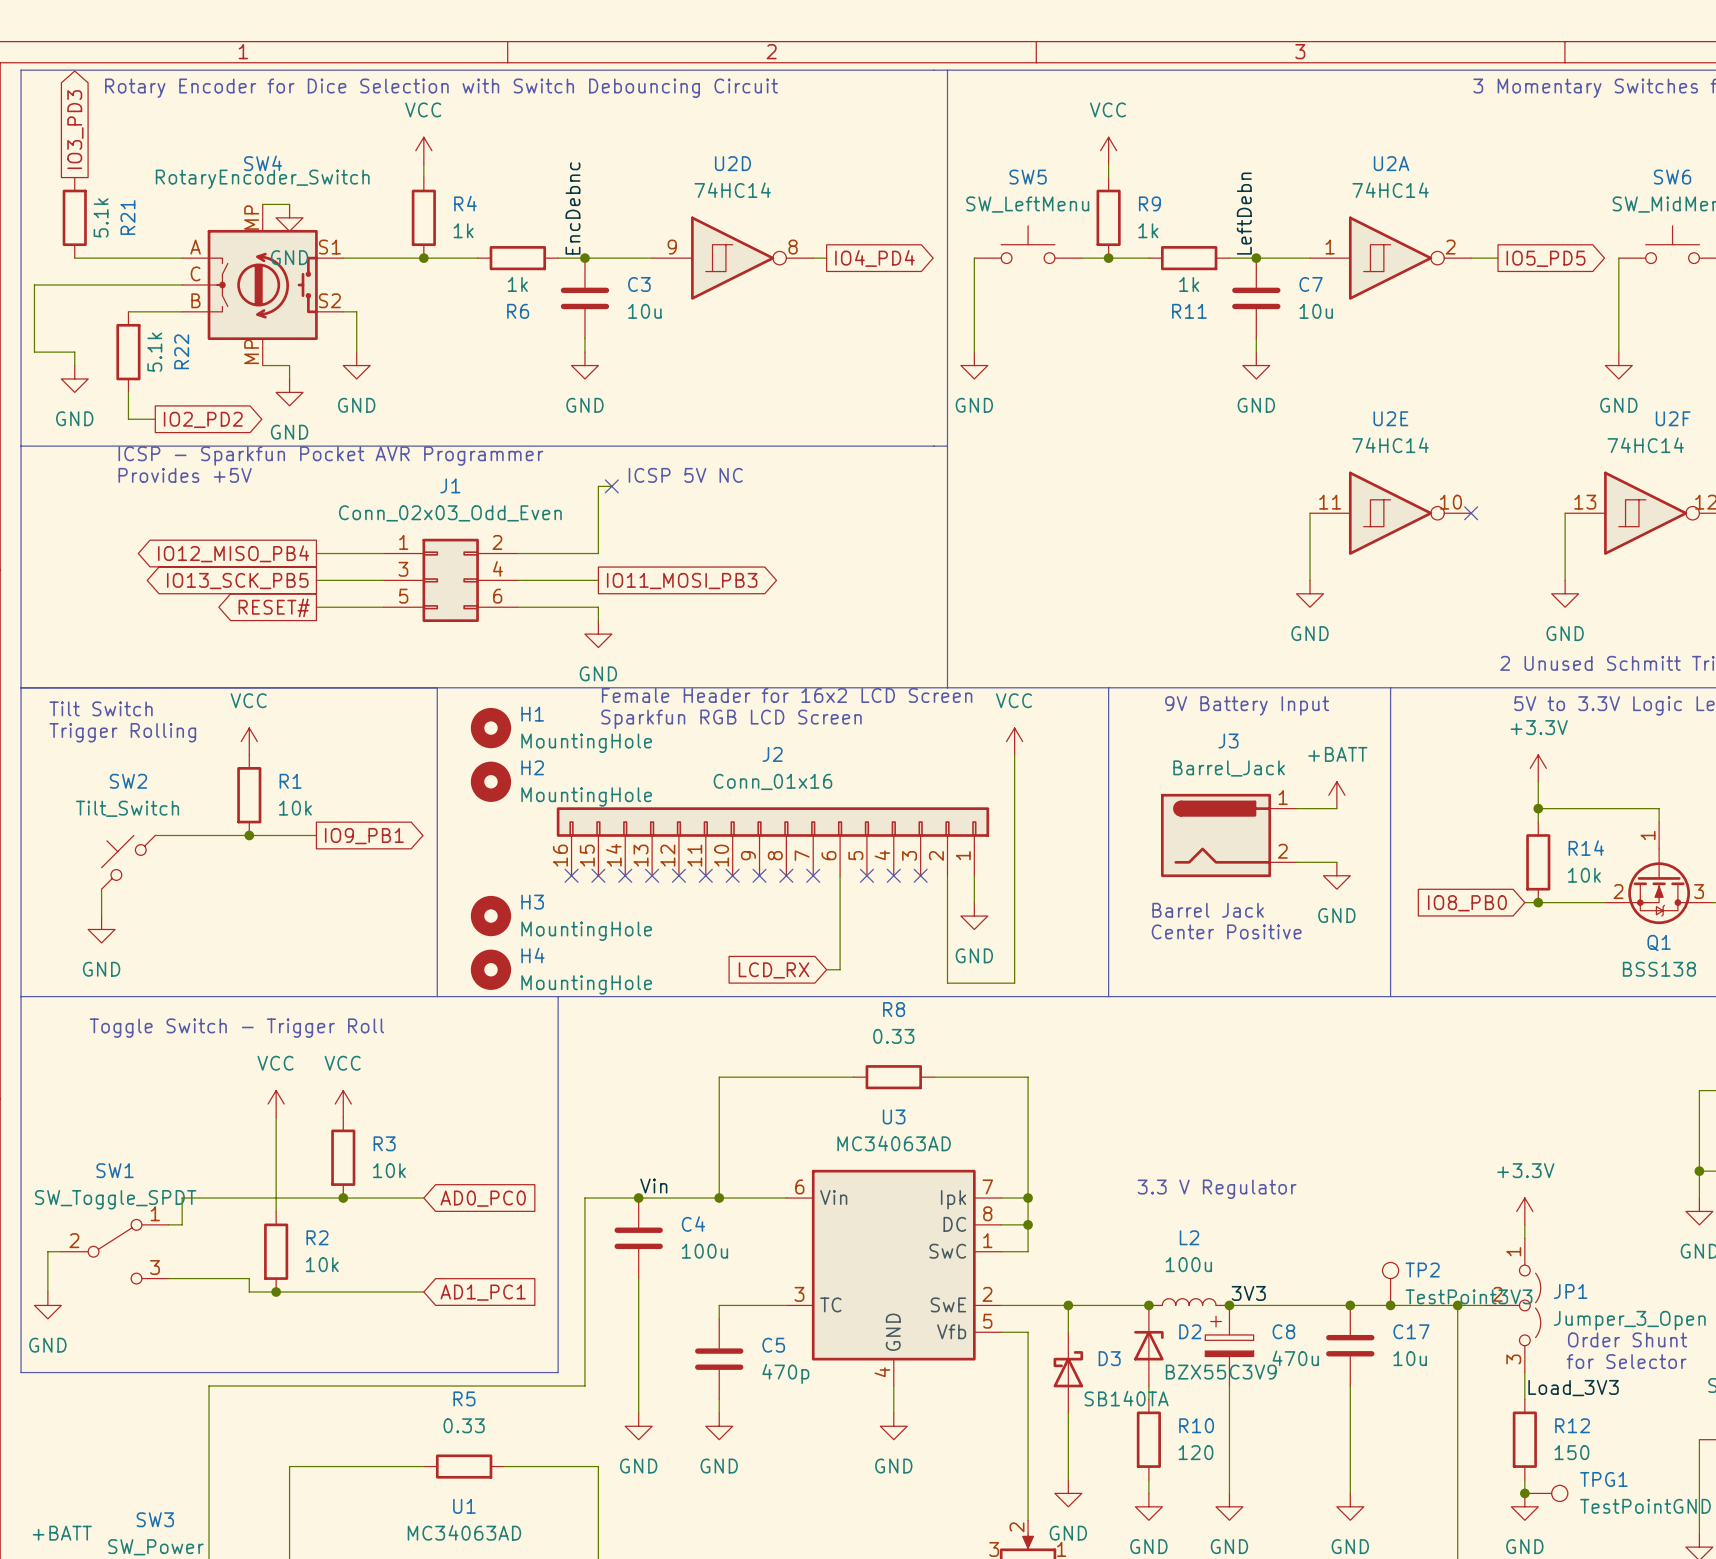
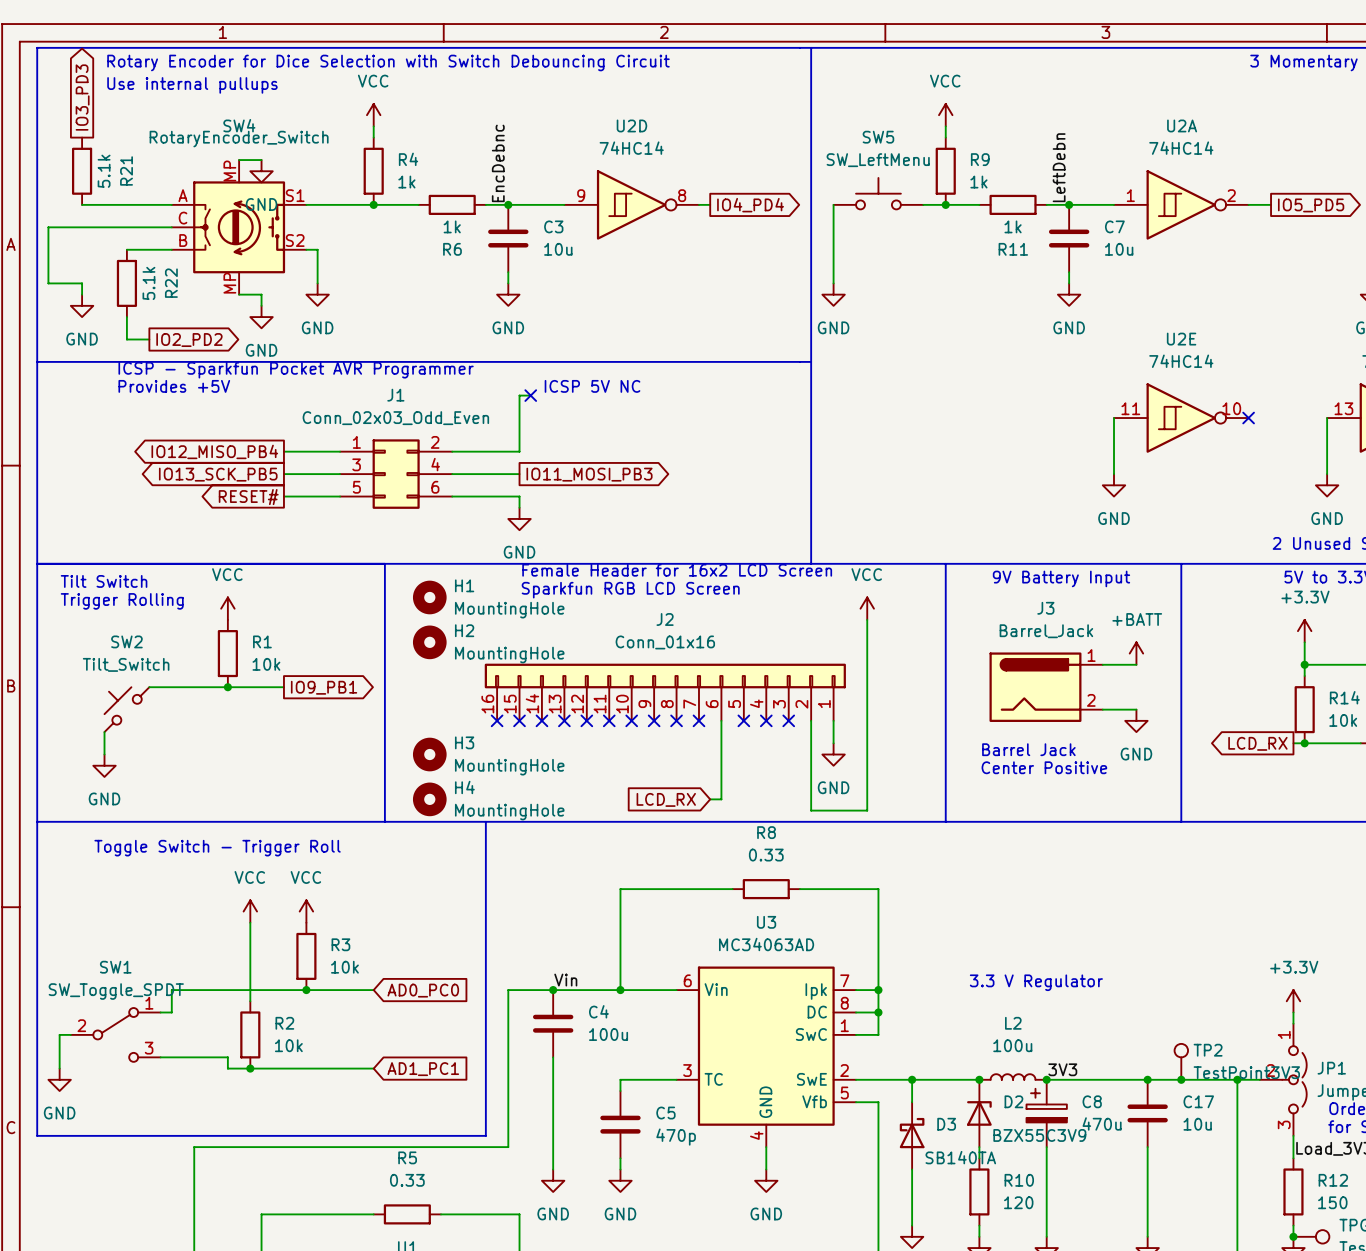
text: none -> Use internal pullups (192, 85)
global label shape: input (1467, 903) -> output (1257, 743)
global label: IO8_PB0 (1467, 903) -> LCD_RX (1257, 743)

